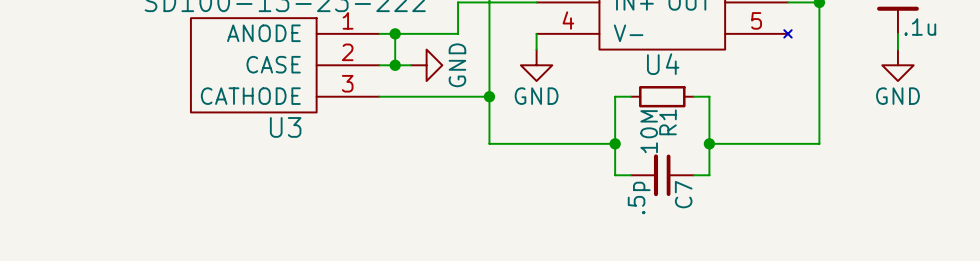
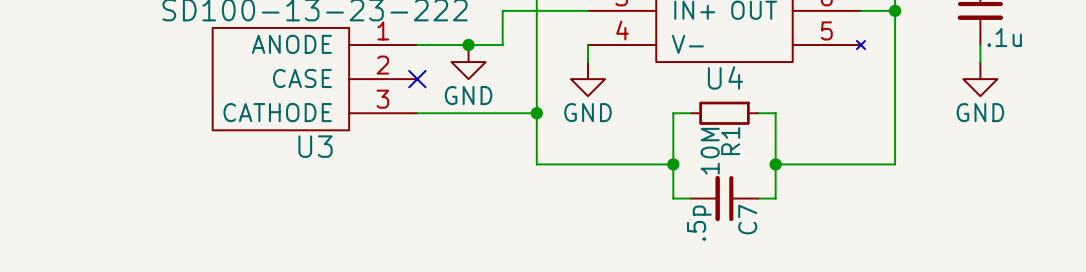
wire: (395, 33) (395, 65) -> none
junction: (395, 33) -> none
junction: none -> (468, 45)
wire: (379, 65) (410, 65) -> none
no-connect mark: none -> (417, 79)
junction: (395, 65) -> none
power symbol rotation: 0° (426, 65) -> 90° clockwise (468, 62)

